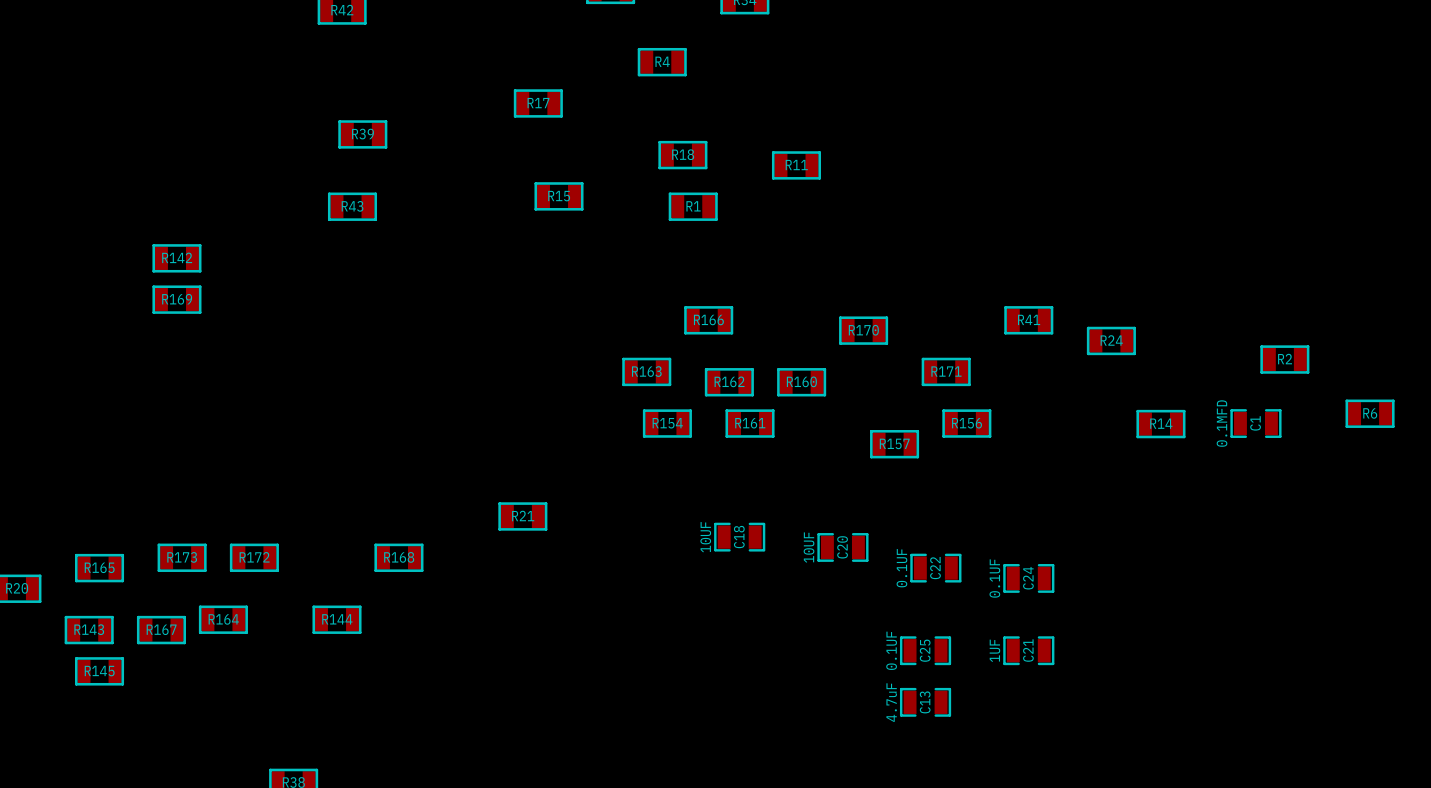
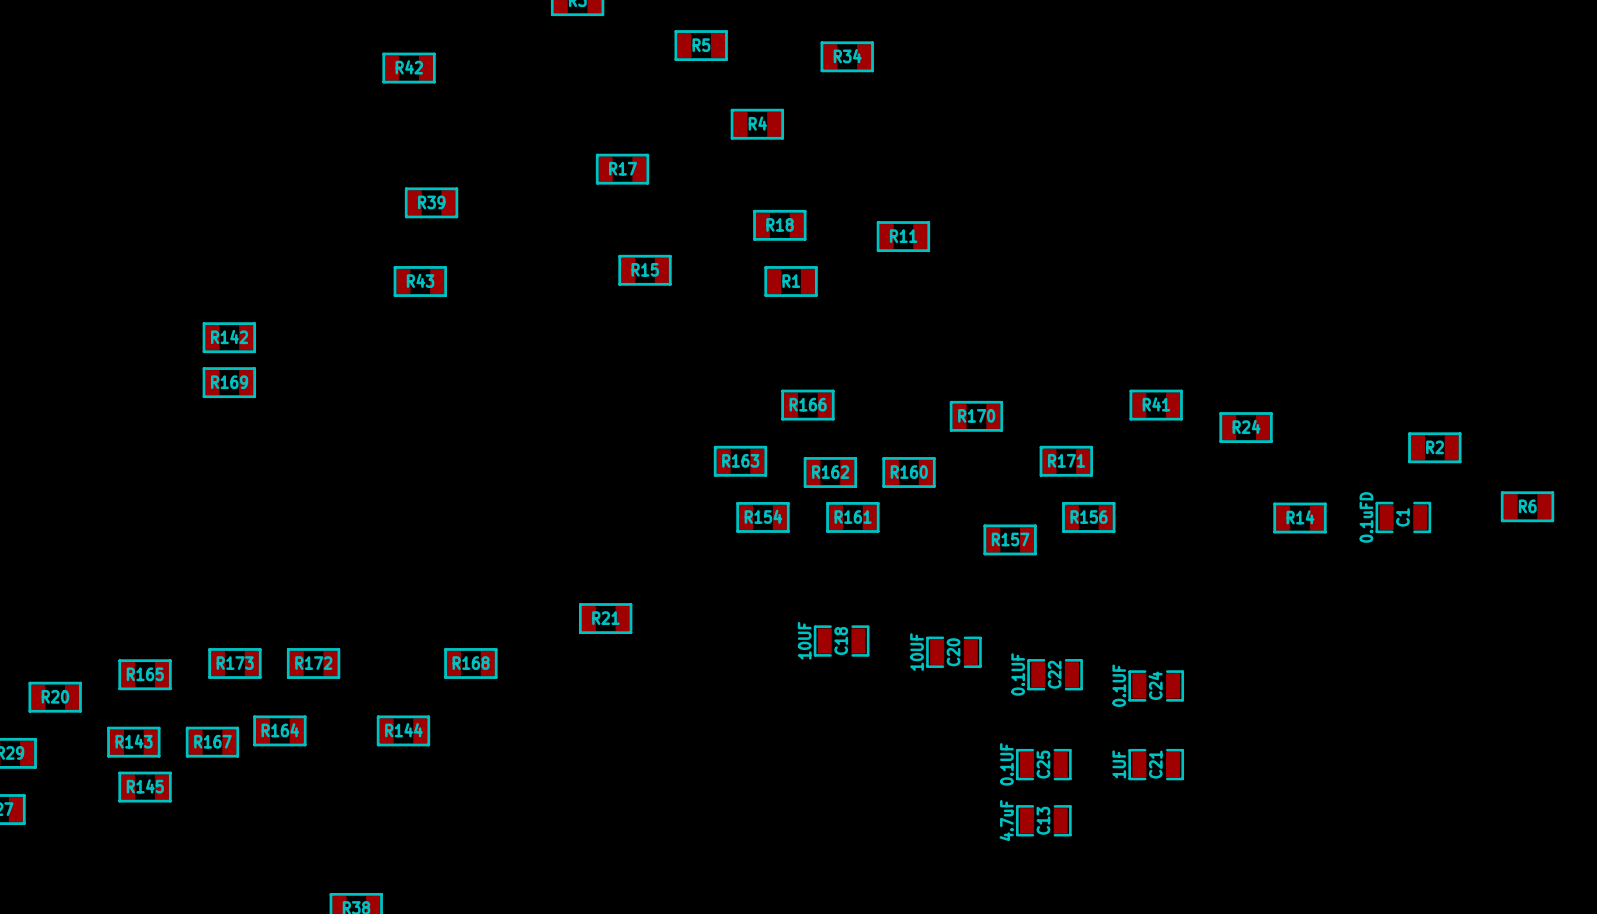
C1 value: 0.1MFD (1222, 423) -> 0.1uFD (1366, 517)

